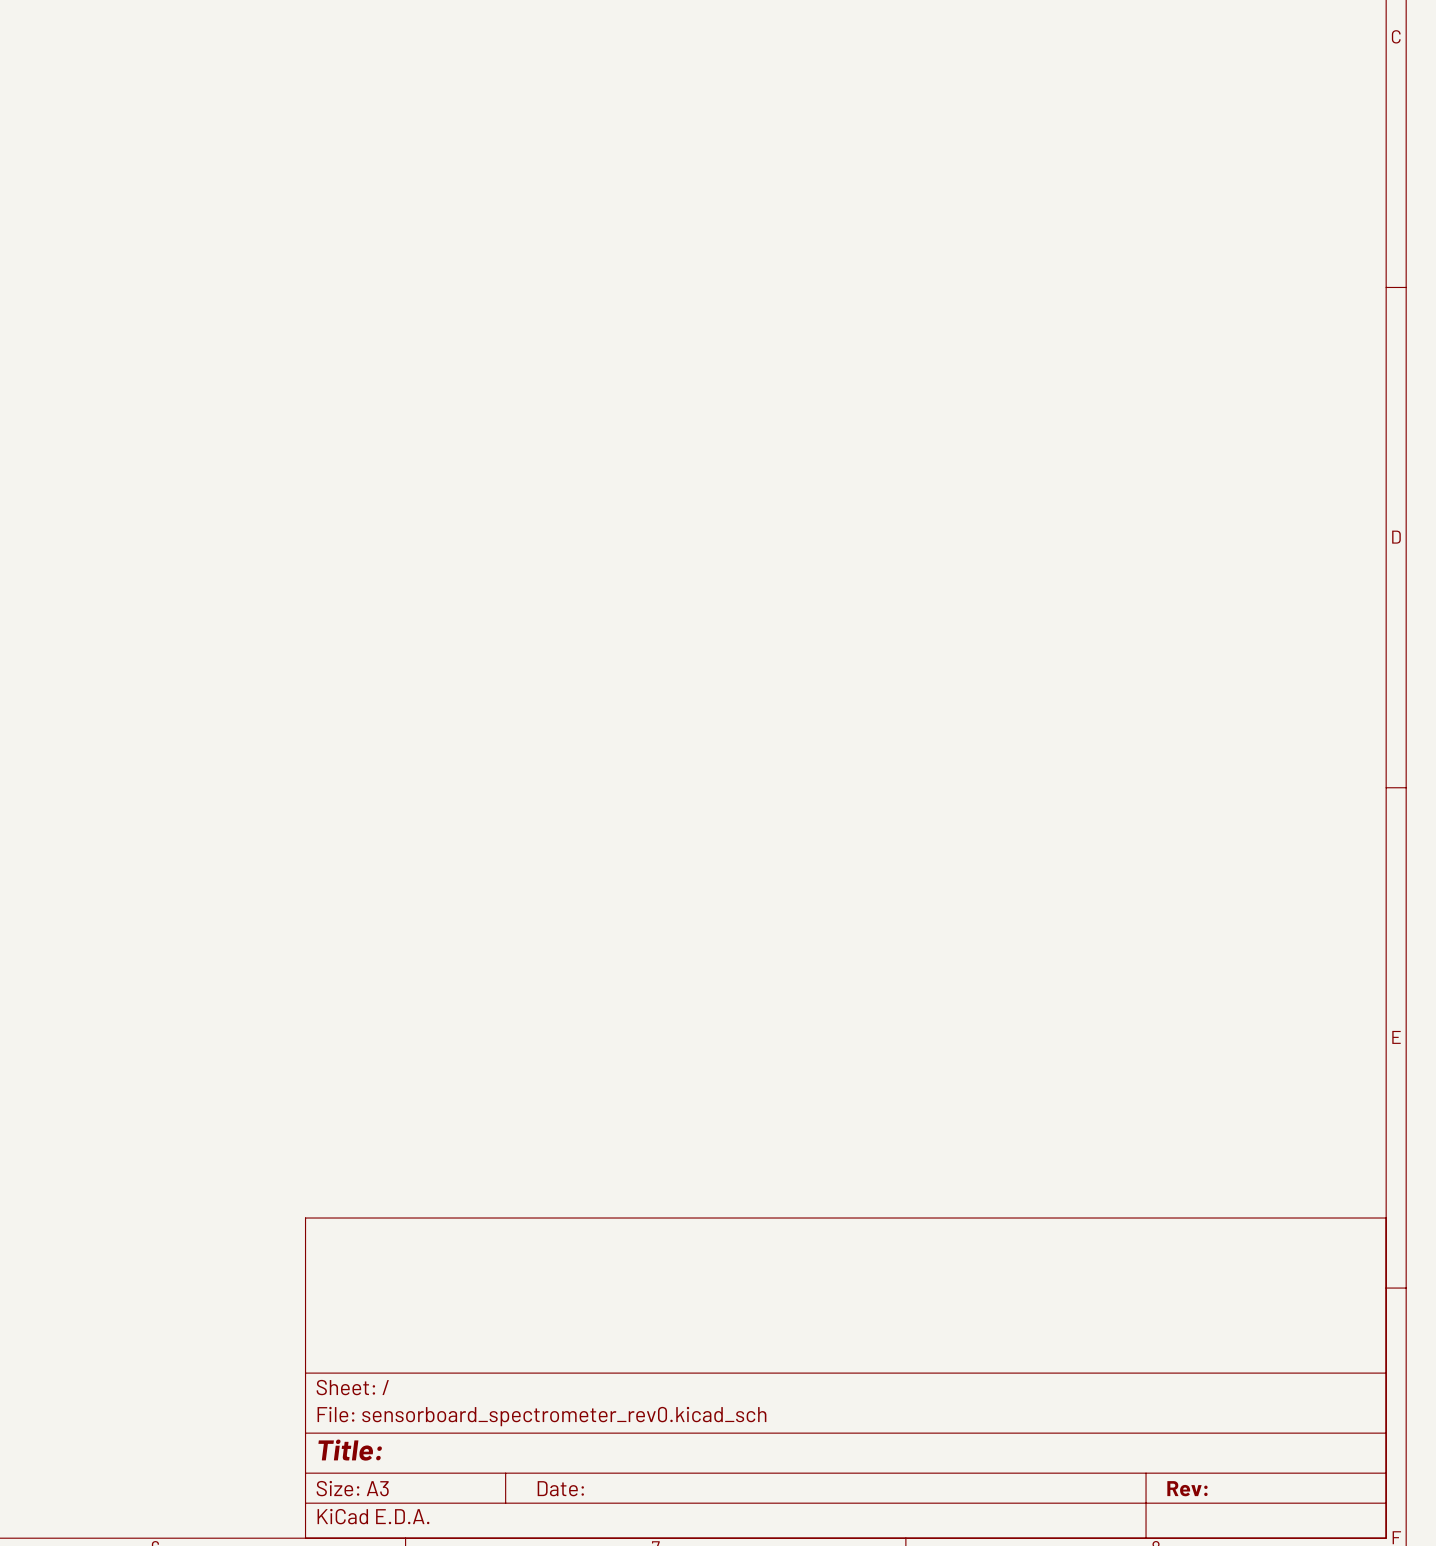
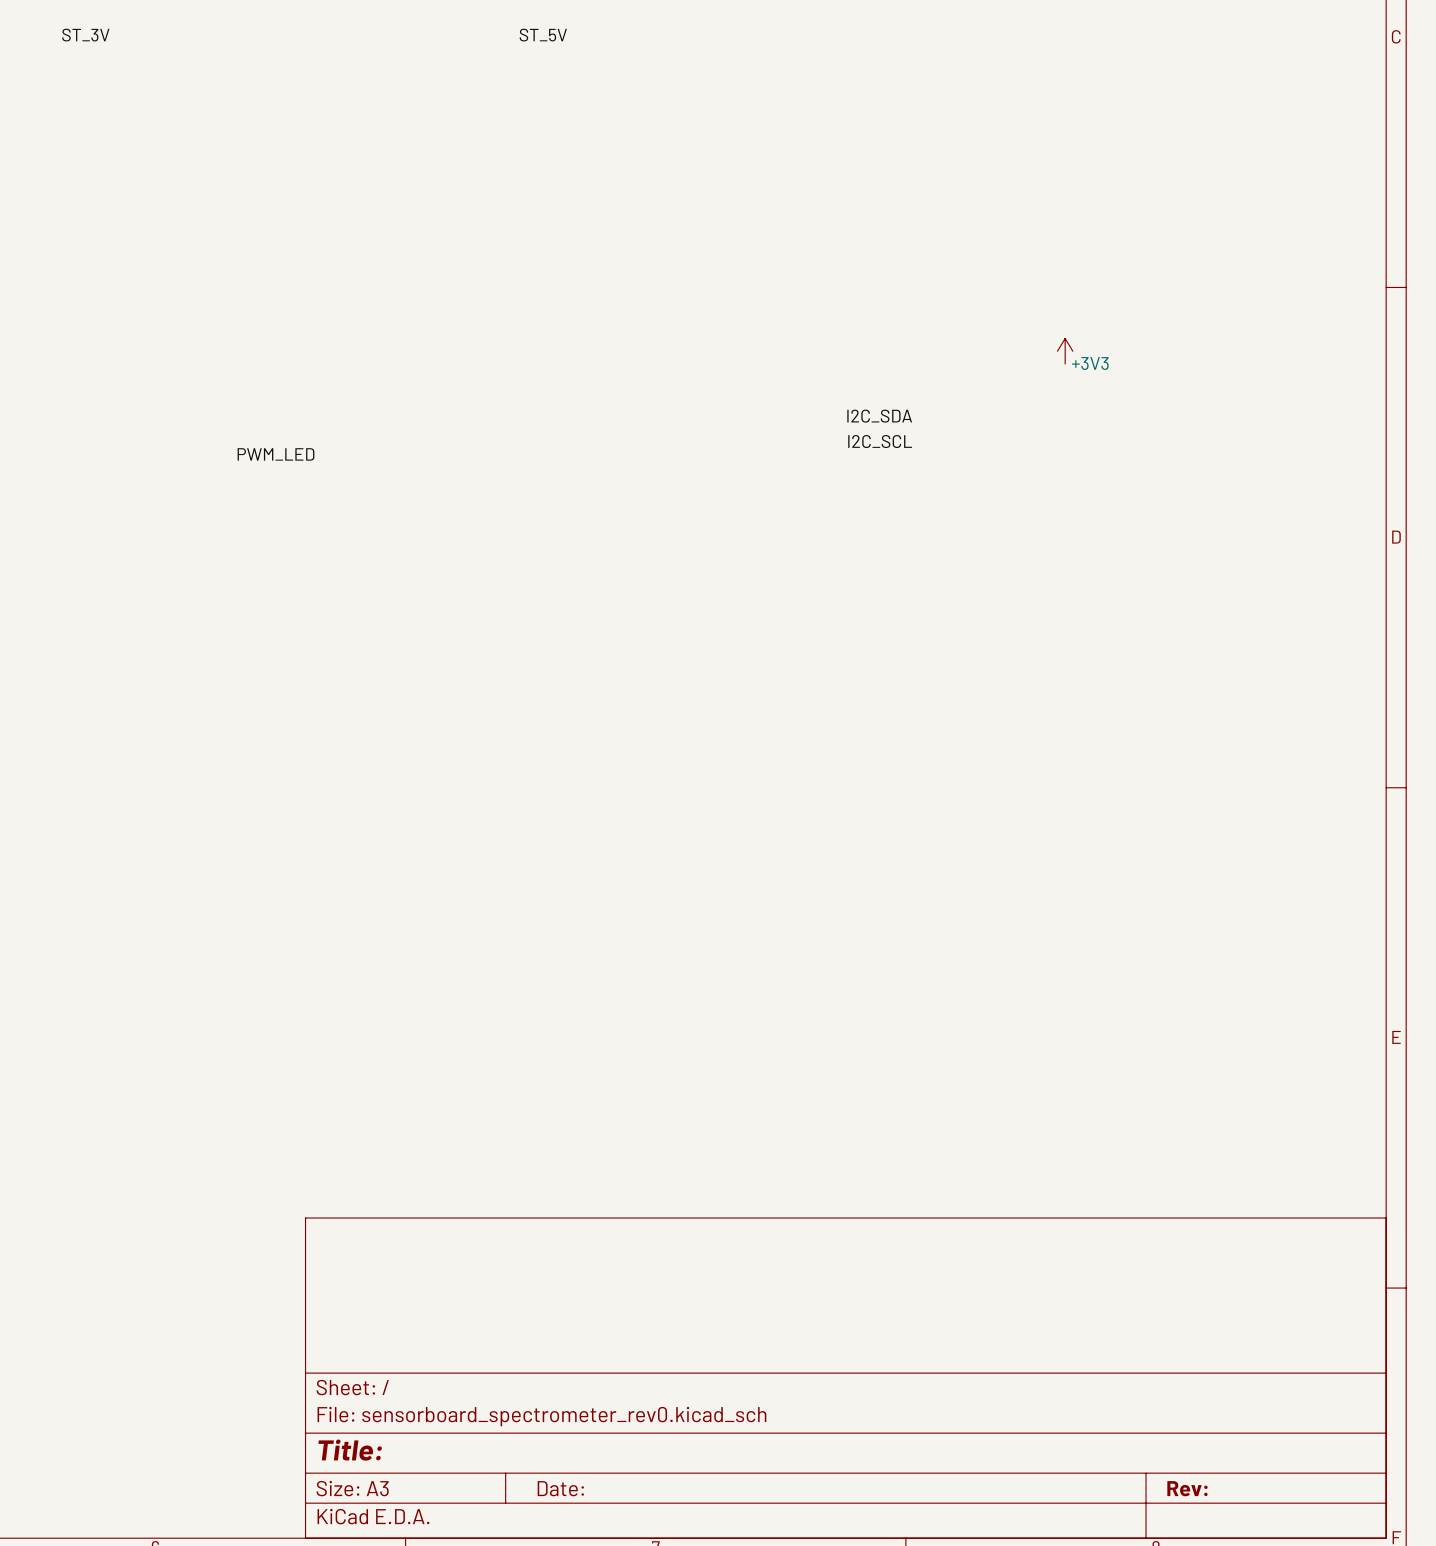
label: none -> ST_3V (85, 35)
label: none -> ST_5V (543, 35)
power symbol: none -> +3V3 (1065, 351)
label: none -> I2C_SDA (879, 416)
label: none -> I2C_SCL (880, 441)
label: none -> PWM_LED (275, 454)

